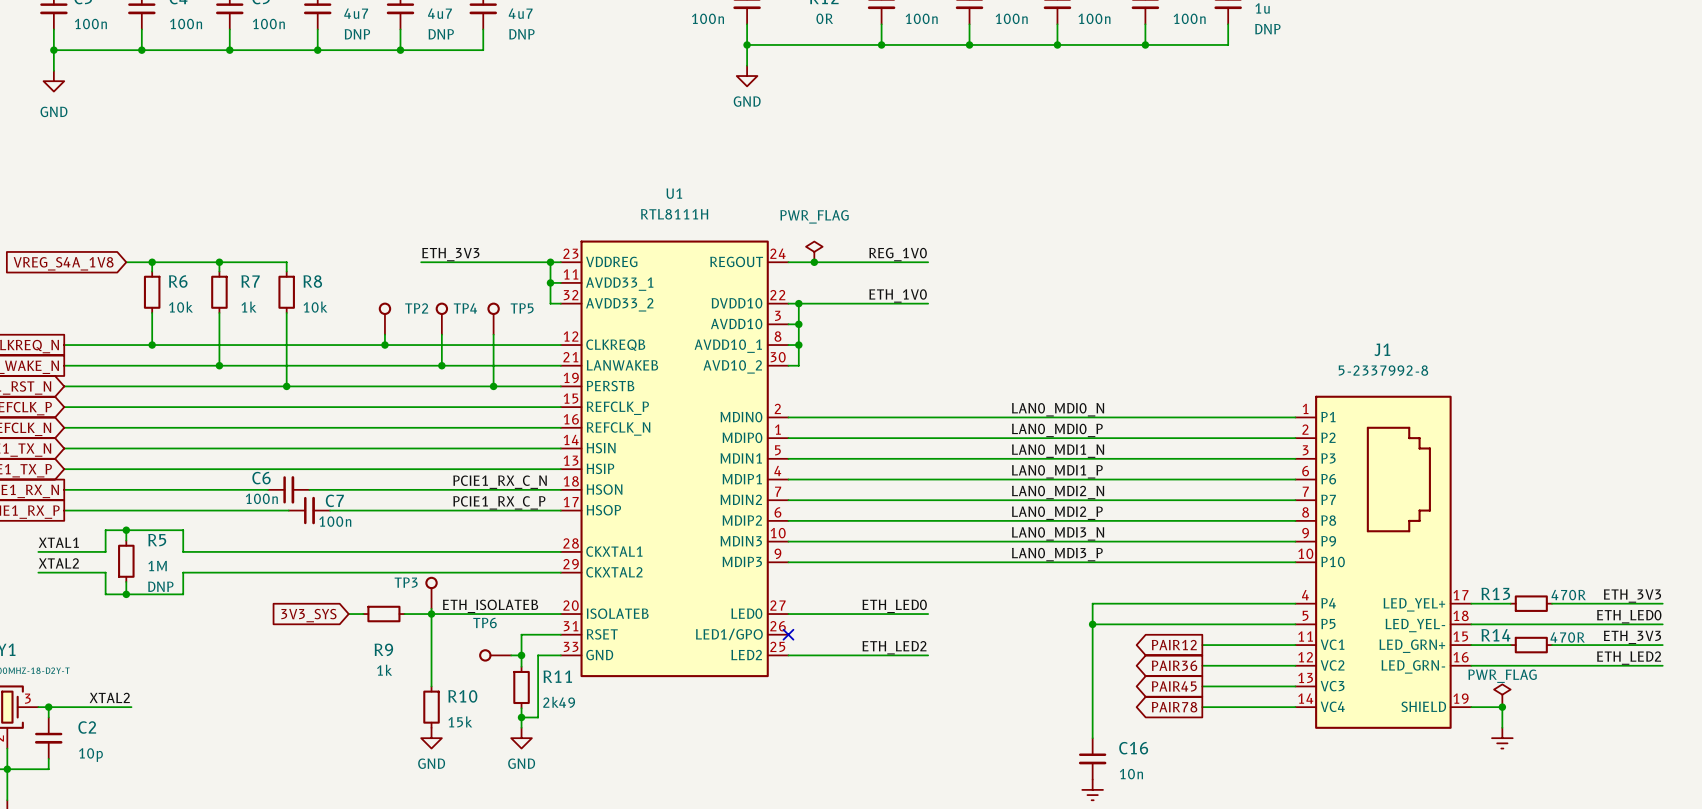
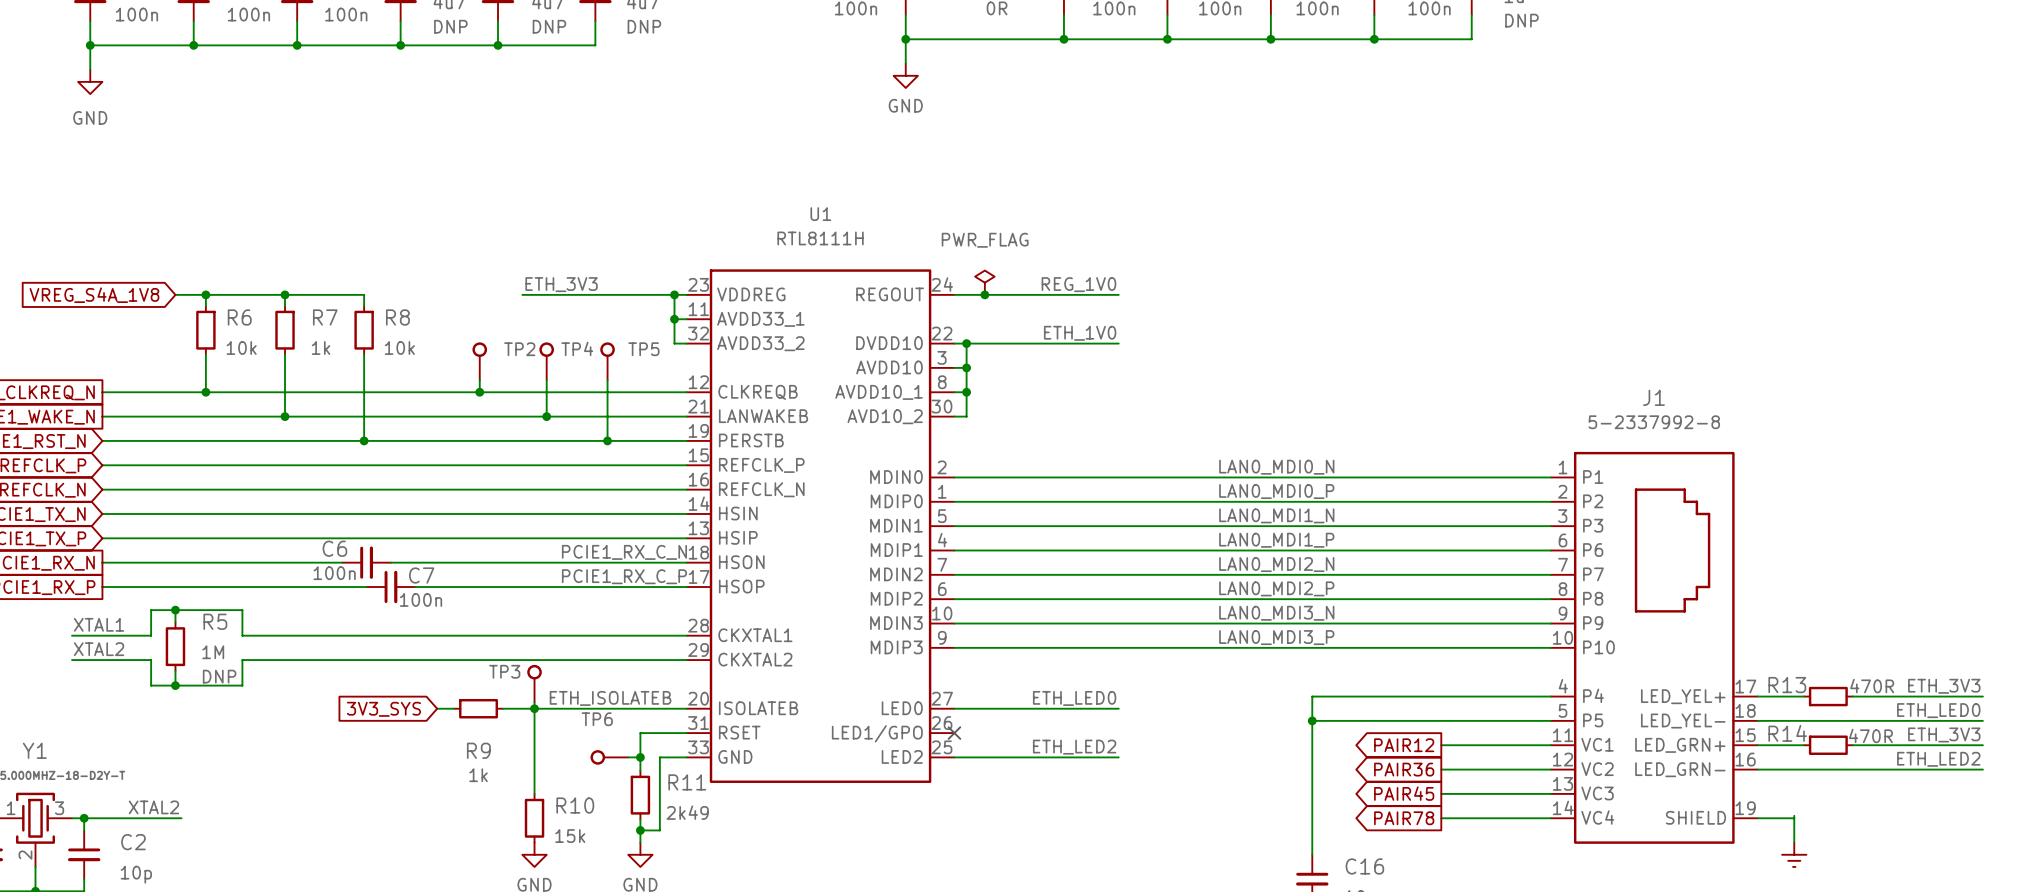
power symbol: PWR_FLAG (1502, 694) -> none
junction: (1502, 707) -> none

